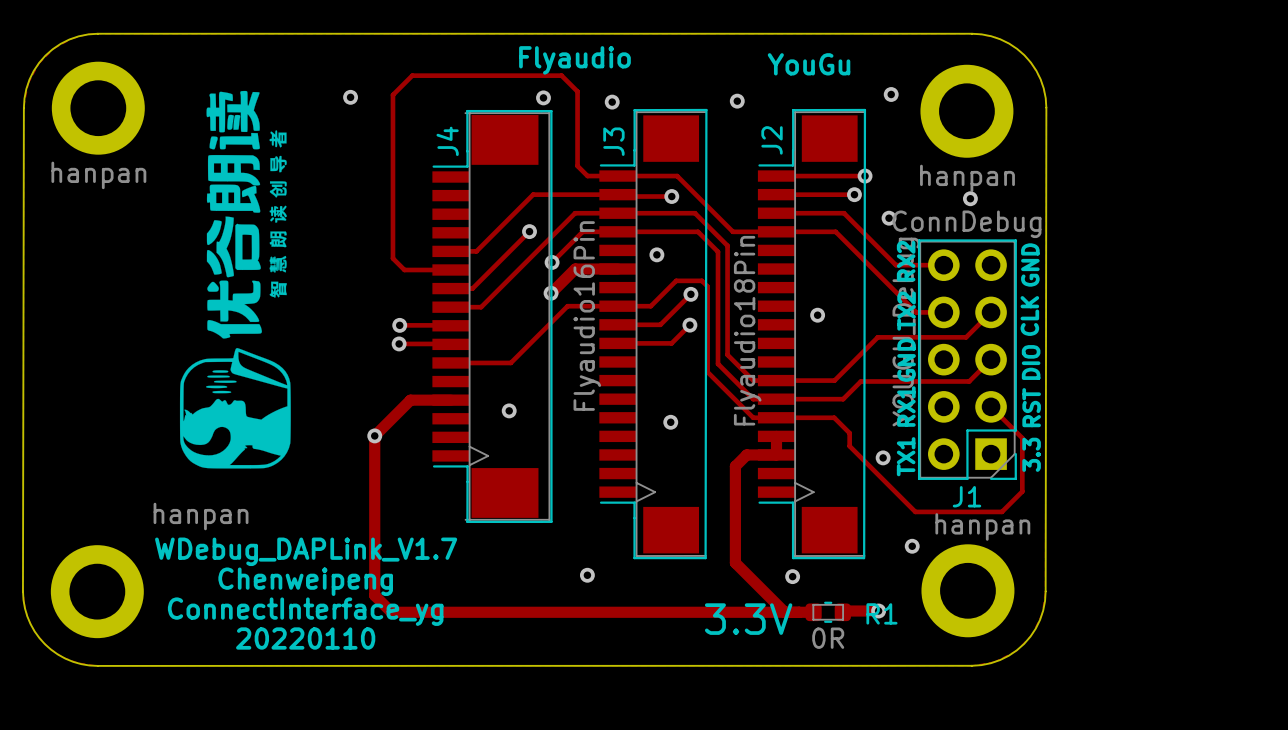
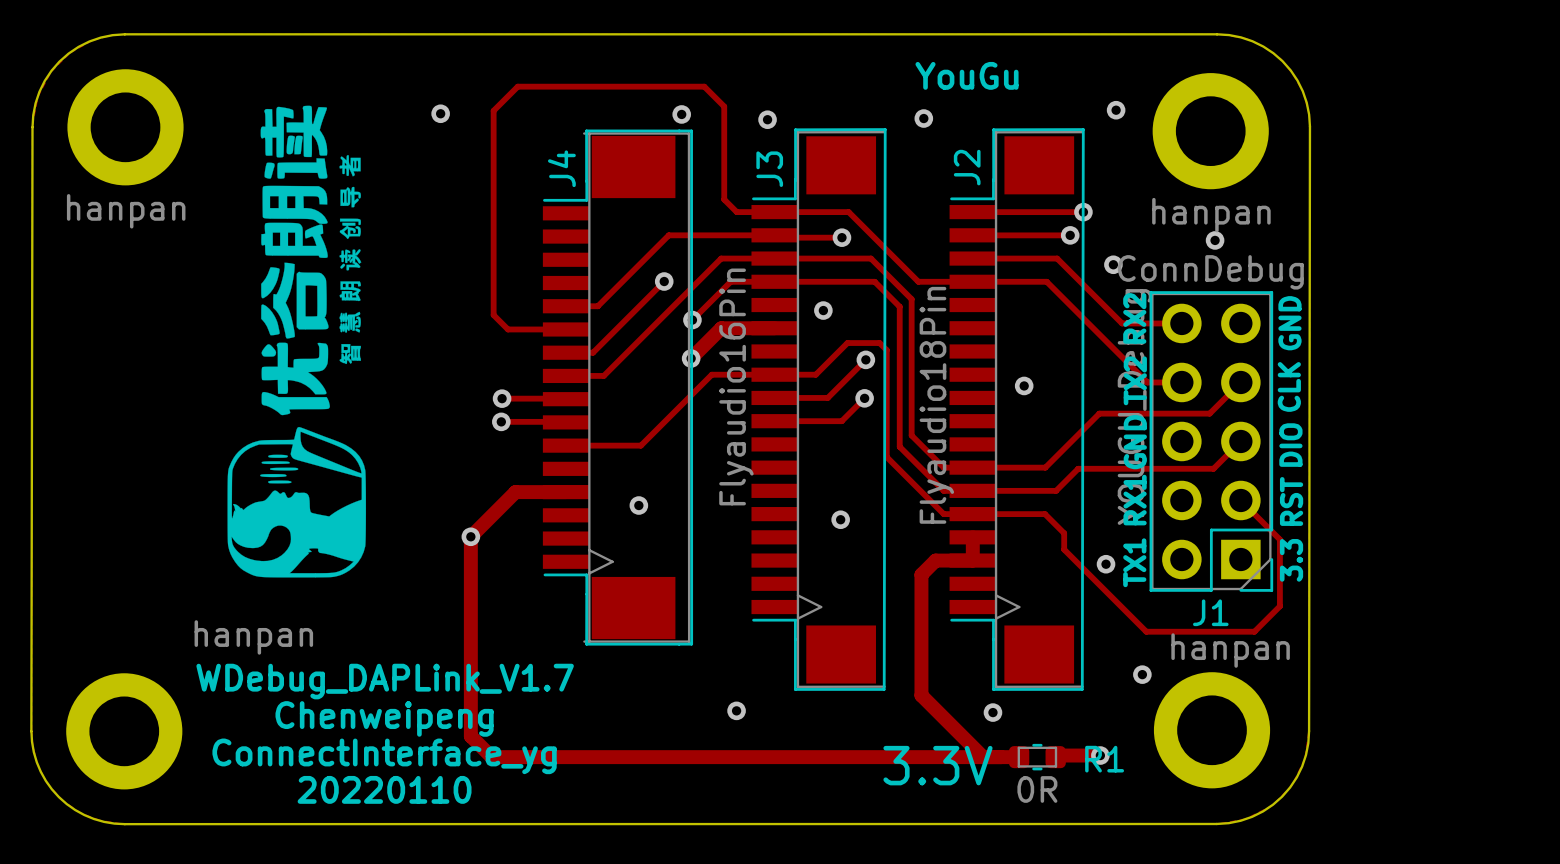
text: Flyaudio (574, 60) -> none
text position: YouGu (809, 64) -> YouGu (967, 75)

